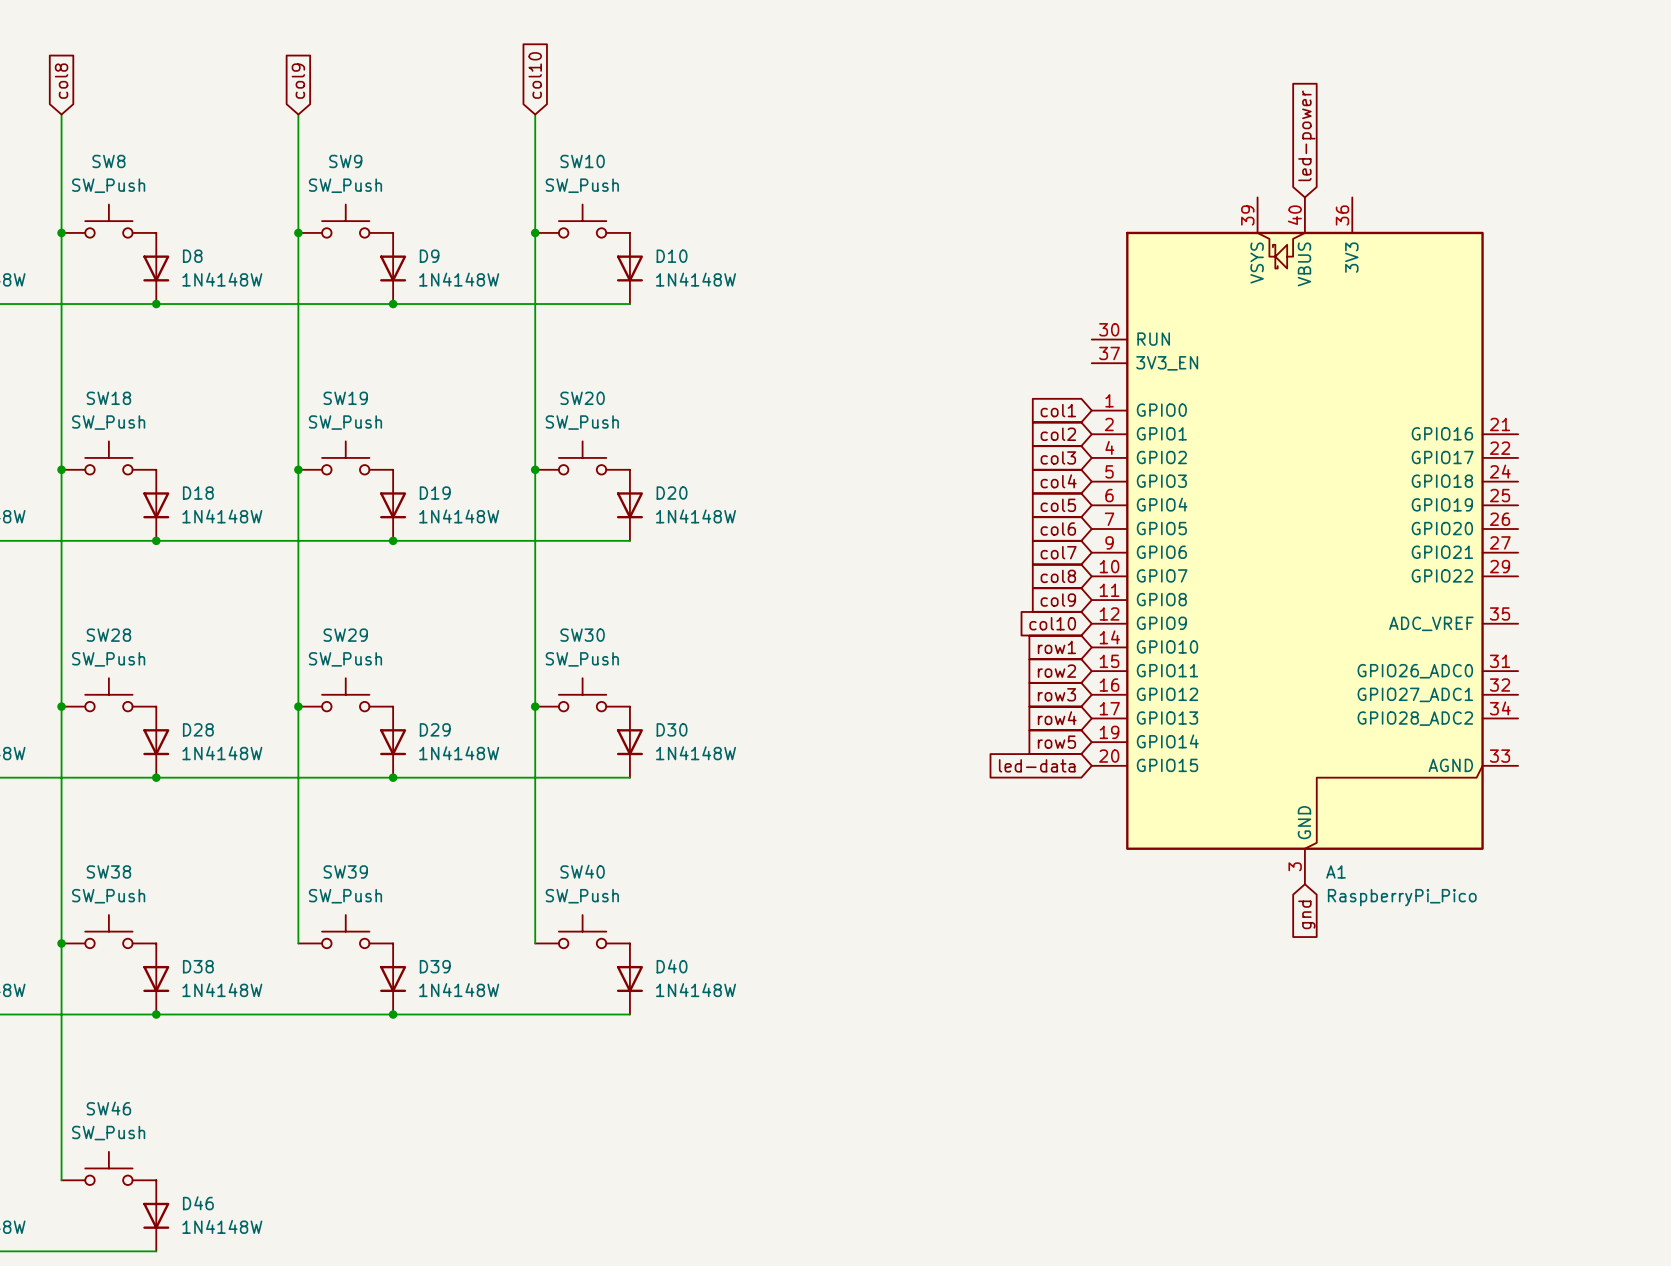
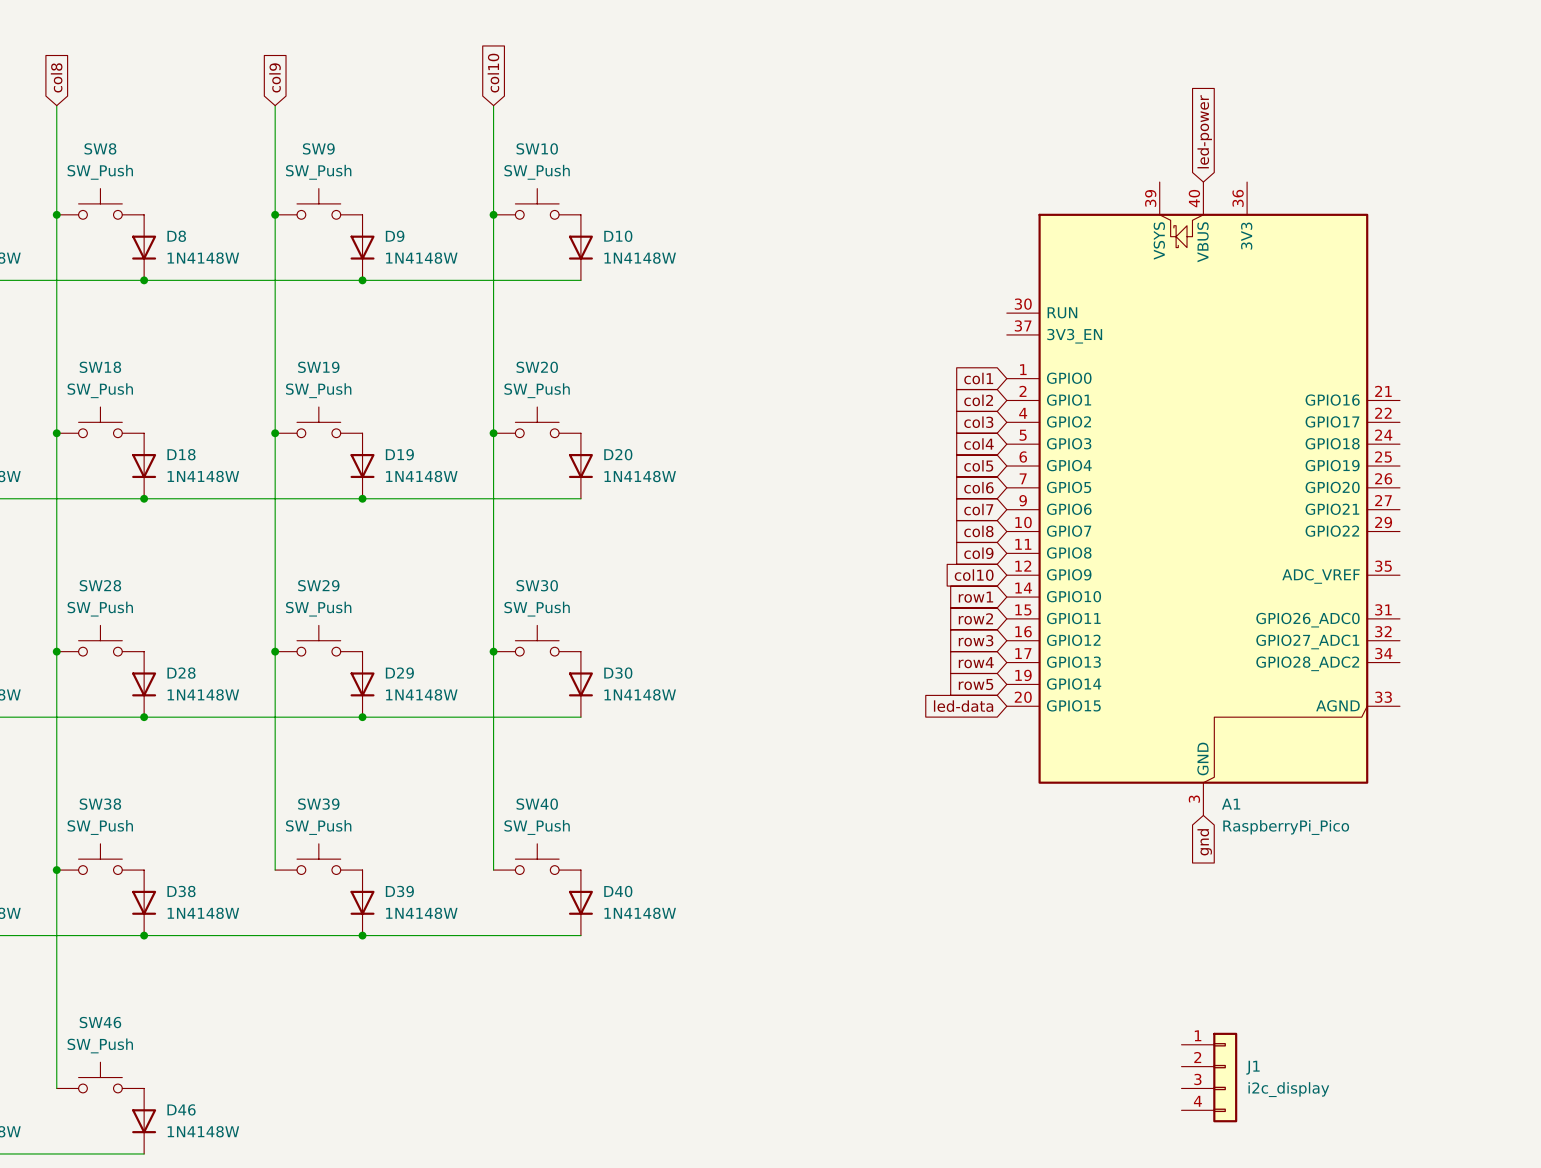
J1: none -> i2c_display (1209, 1077)

